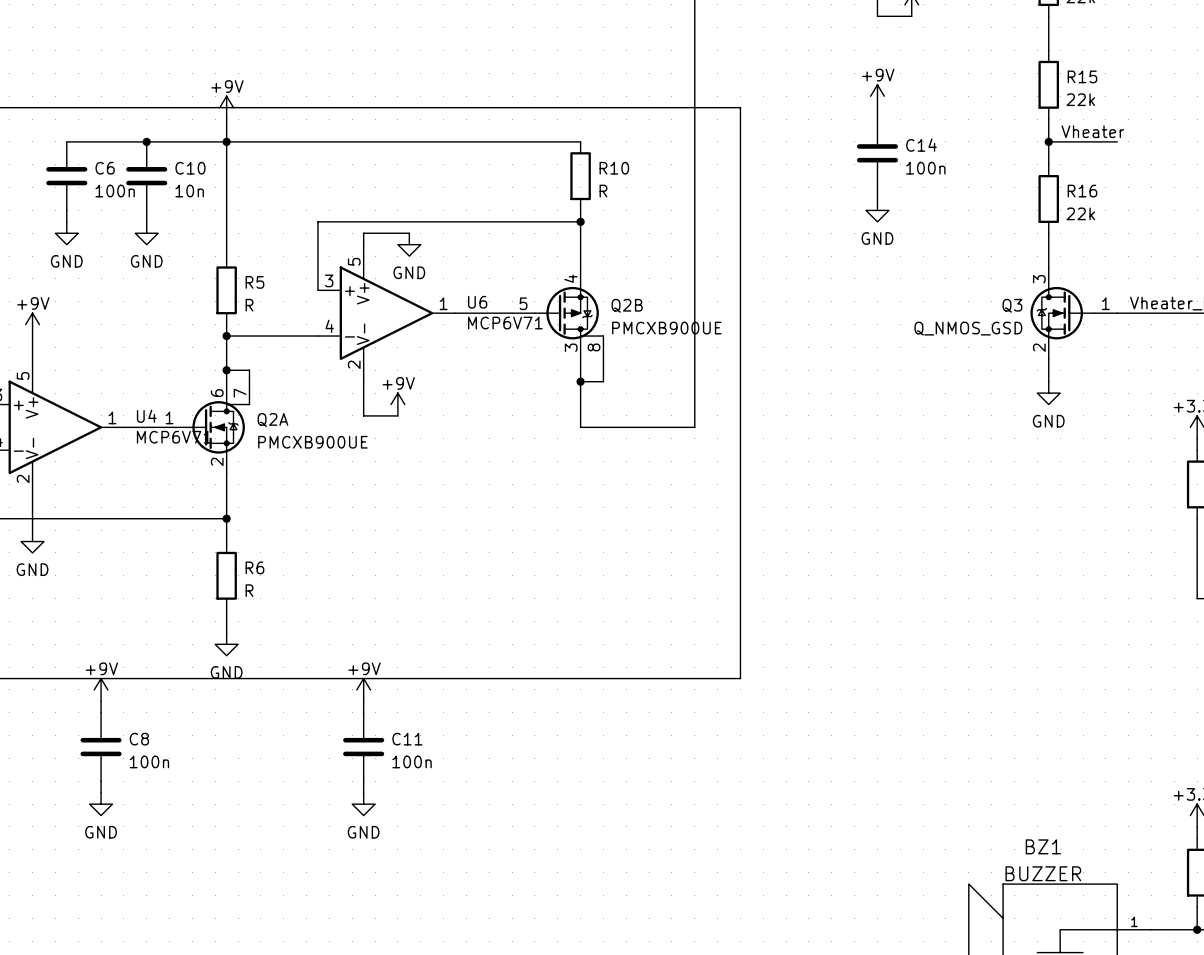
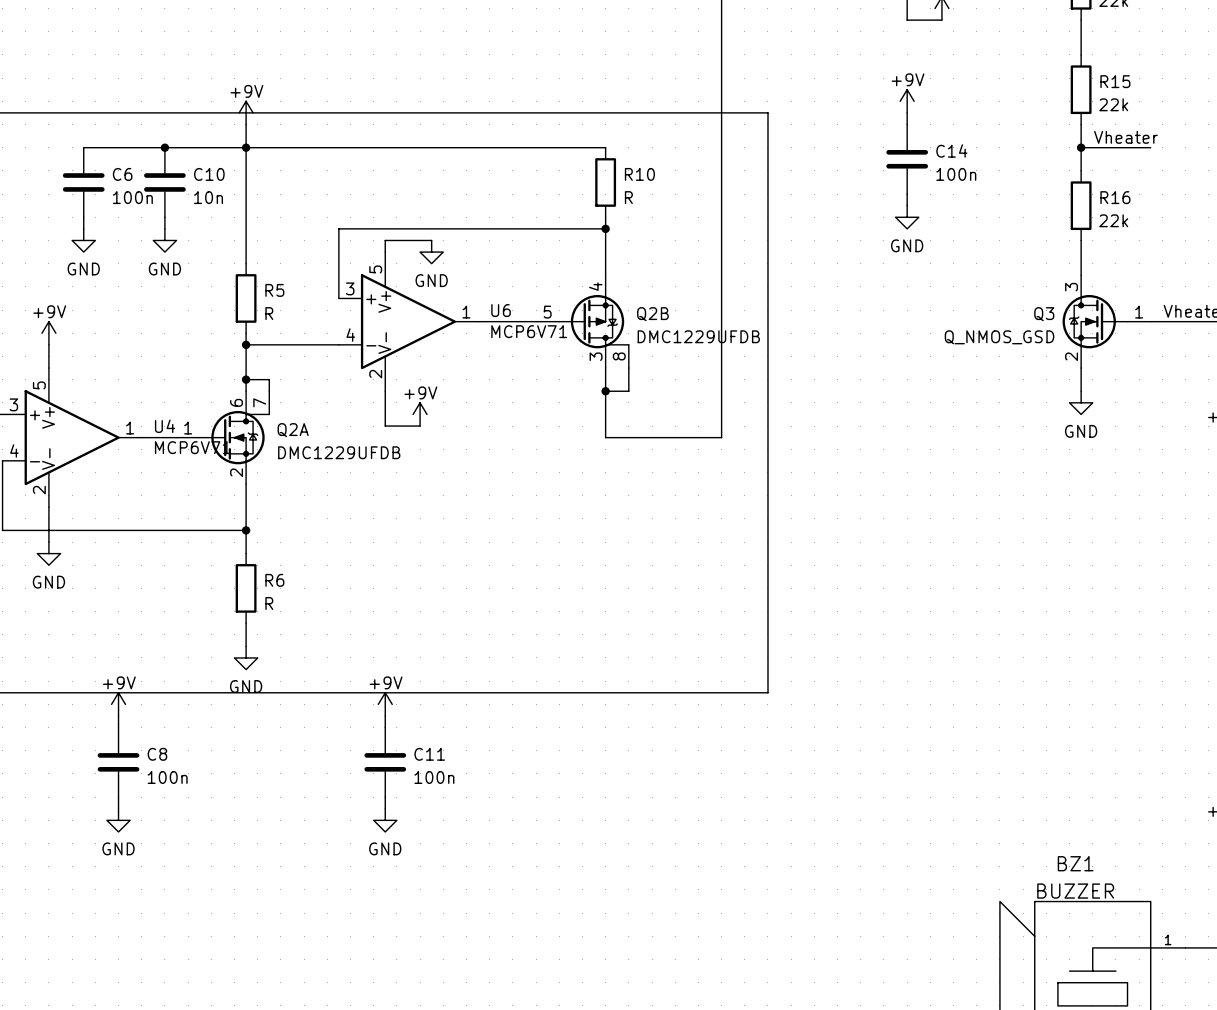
Q2B value: PMCXB900UE (666, 328) -> DMC1229UFDB (698, 336)
Q2A value: PMCXB900UE (312, 442) -> DMC1229UFDB (339, 452)

